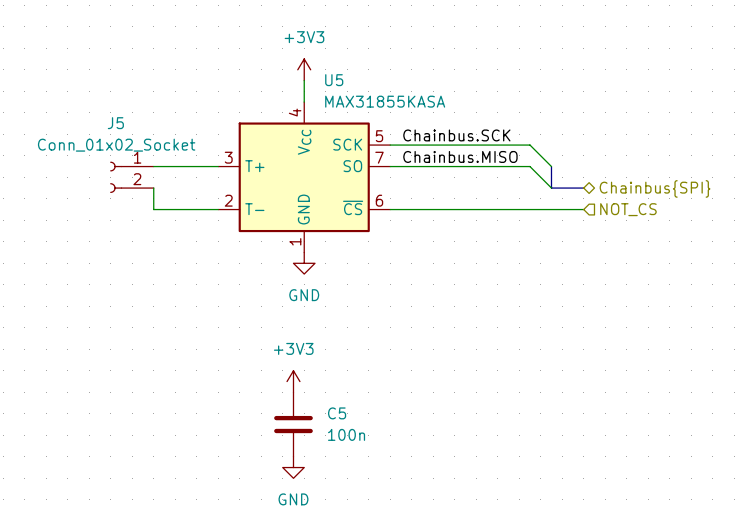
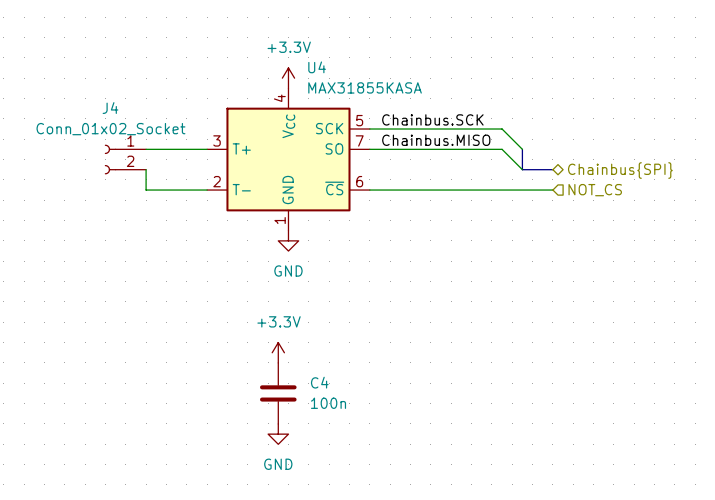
power symbol: +3V3 (304, 69) -> none
U5 name: U5 (334, 80) -> U4 (317, 67)
power symbol: none -> +3.3V (288, 78)
J5 name: J5 (115, 123) -> J4 (110, 108)
power symbol: +3V3 (293, 381) -> +3.3V (278, 352)
C5 name: C5 (337, 413) -> C4 (319, 382)

